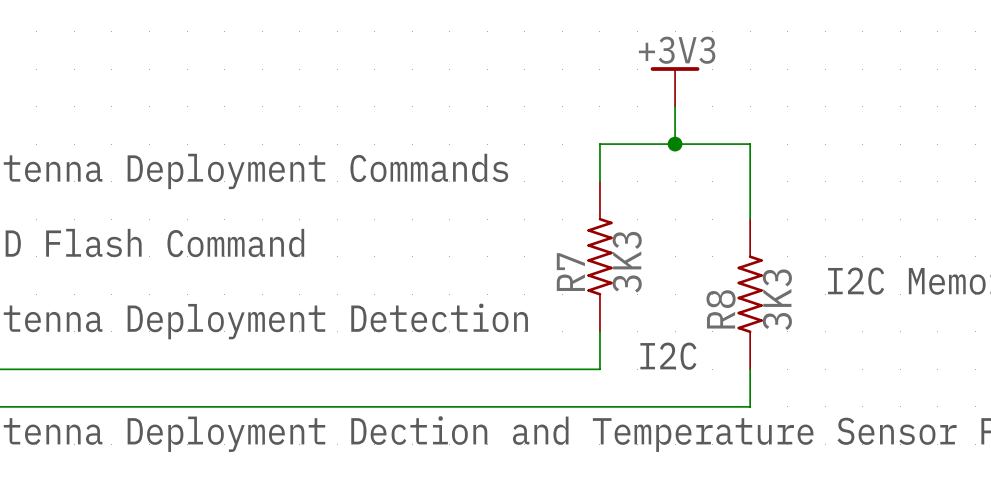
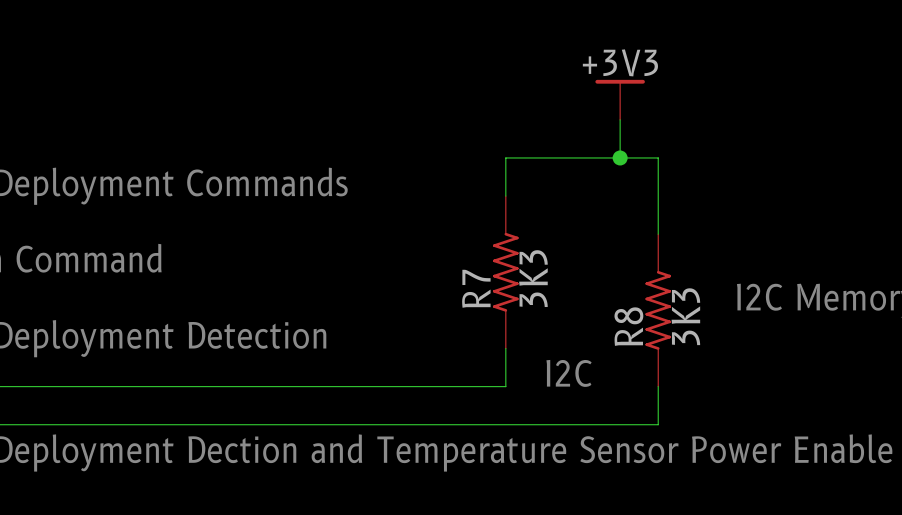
power symbol position: +3V3 (675, 86) -> +3V3 (620, 99)
wire: (675, 106) (675, 144) -> (620, 119) (620, 157)
junction position: (675, 144) -> (620, 157)

